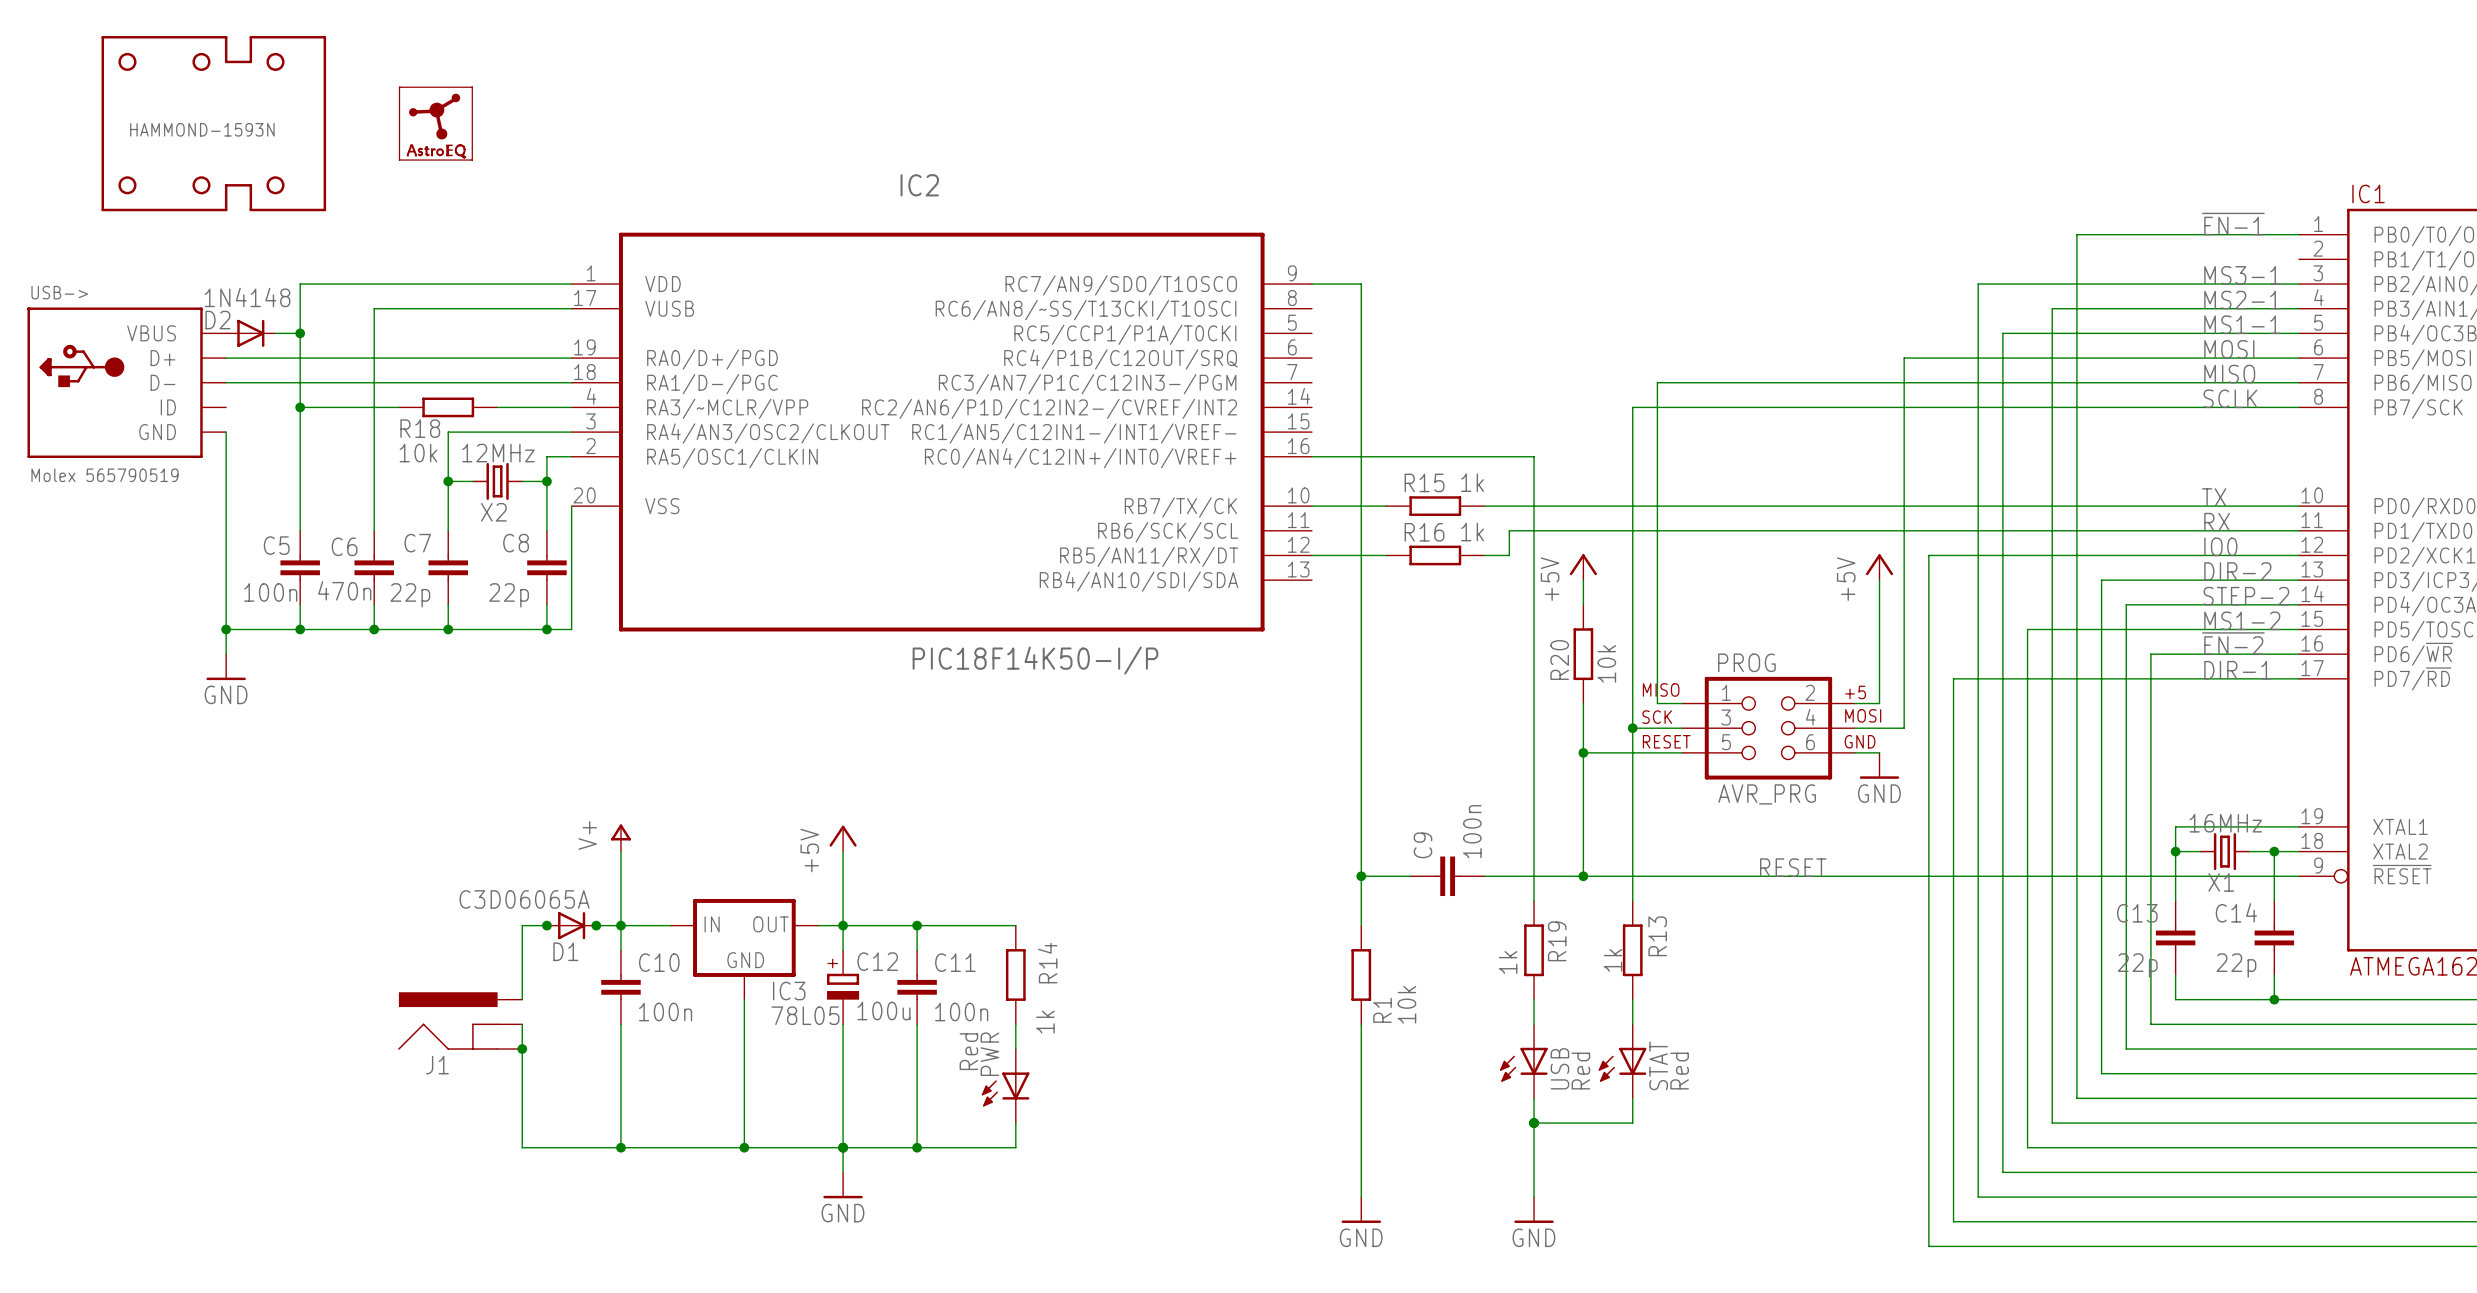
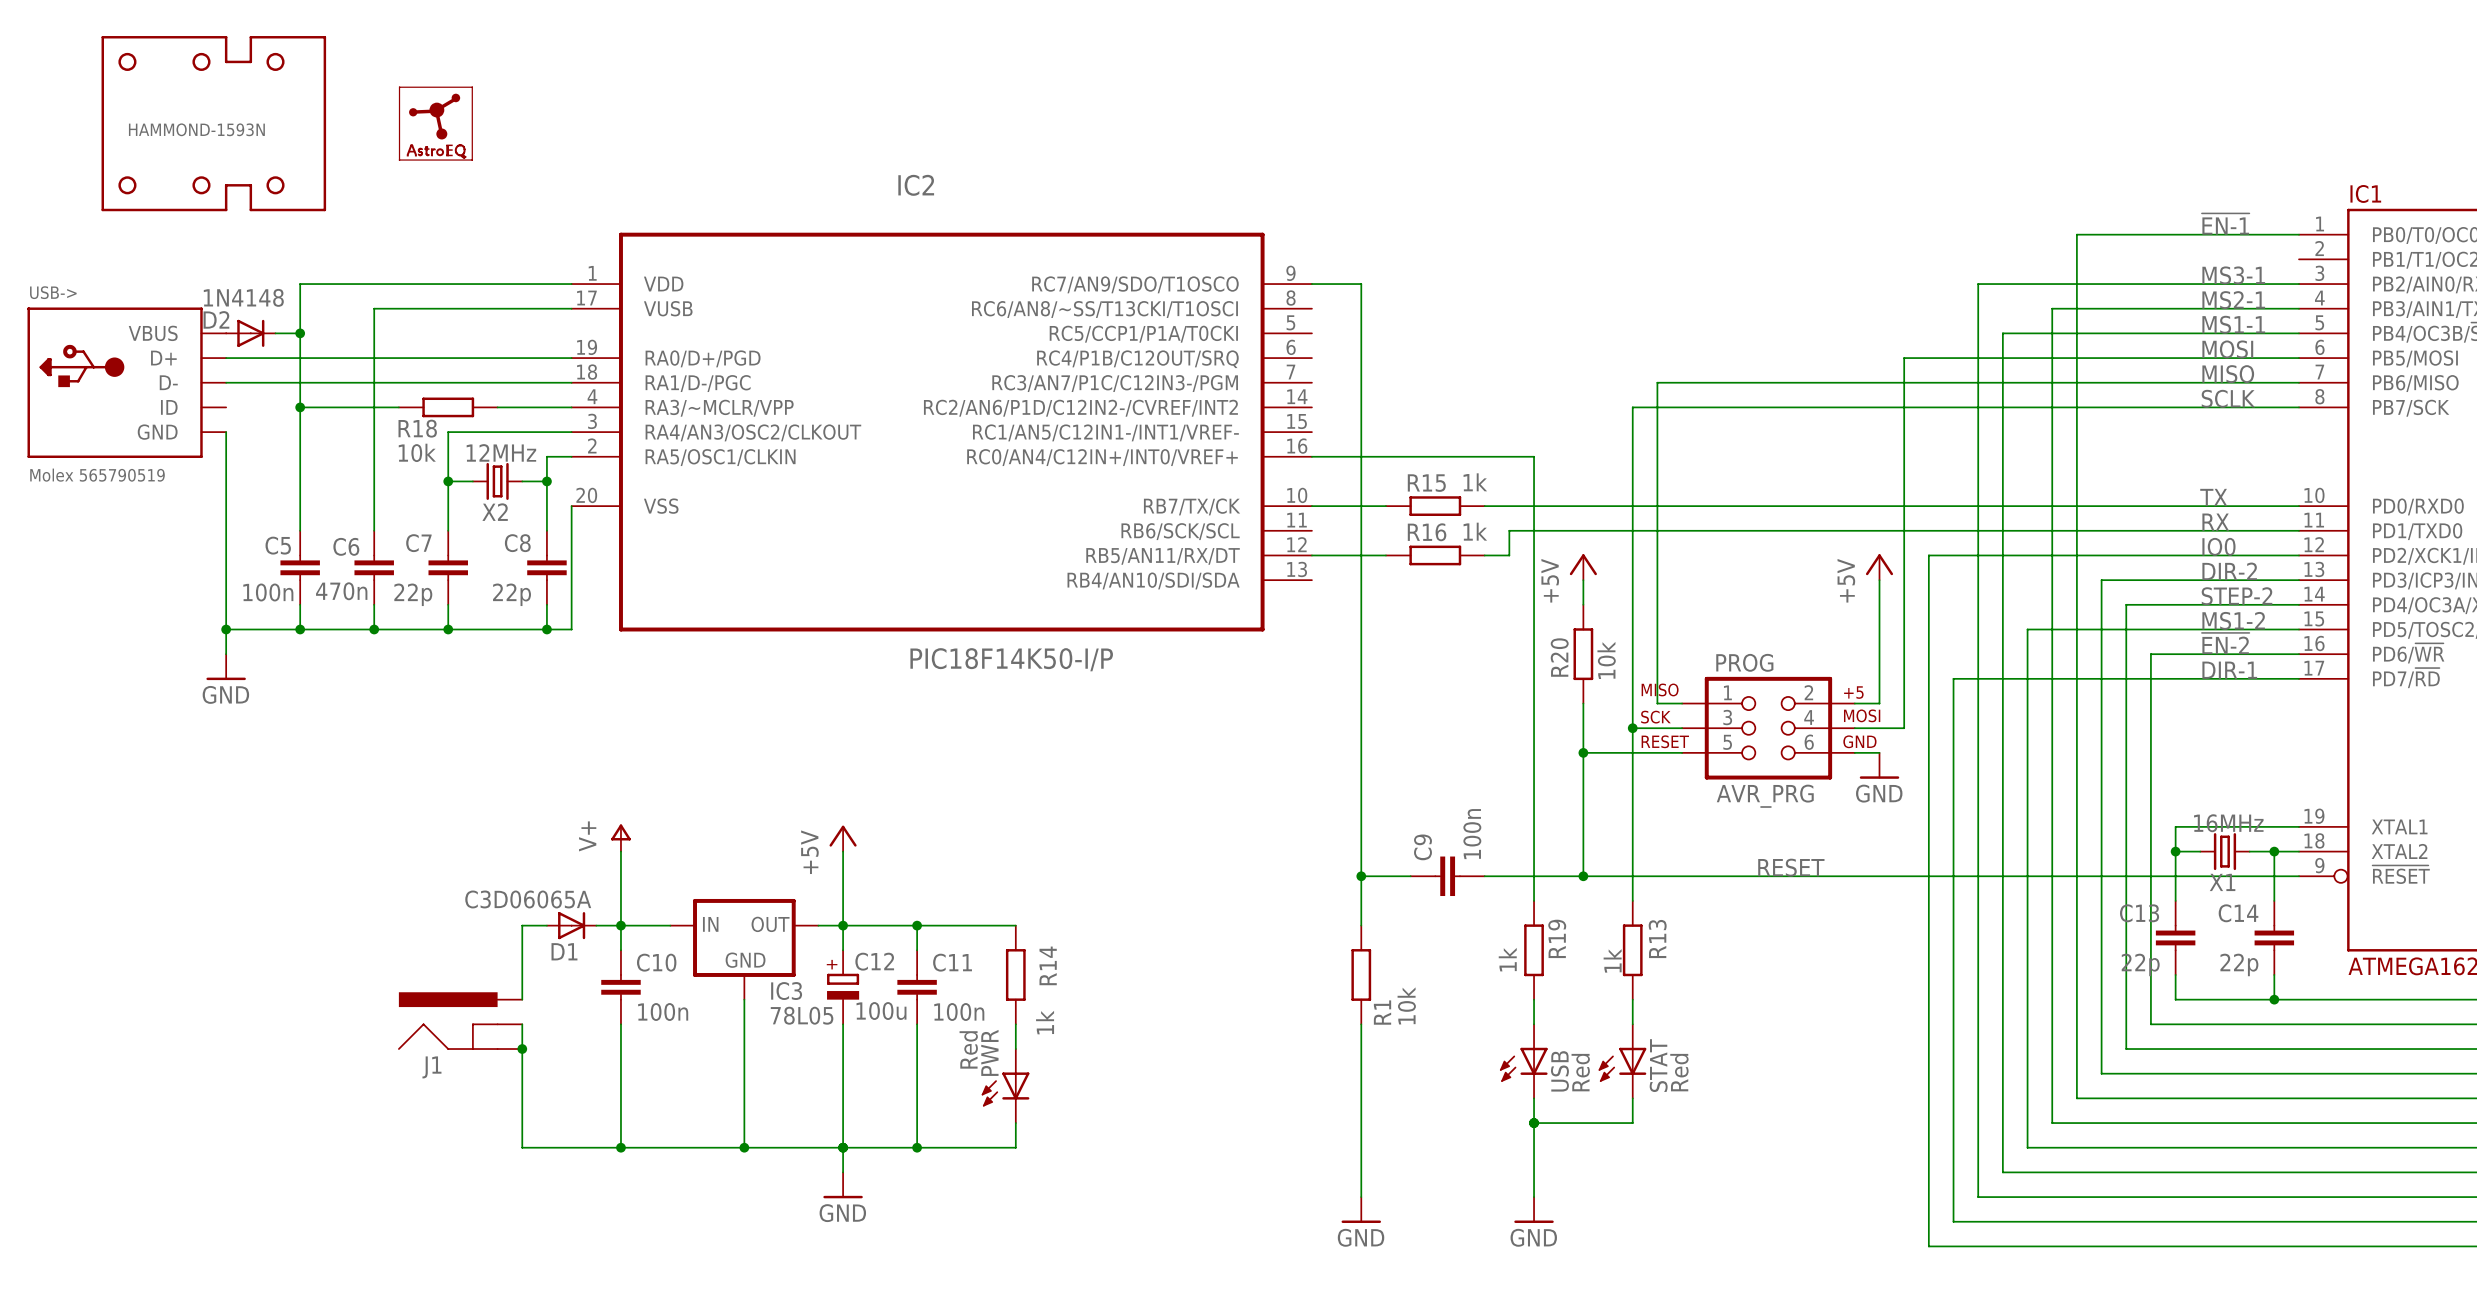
junction: (546, 925) -> none
junction: (596, 925) -> none

